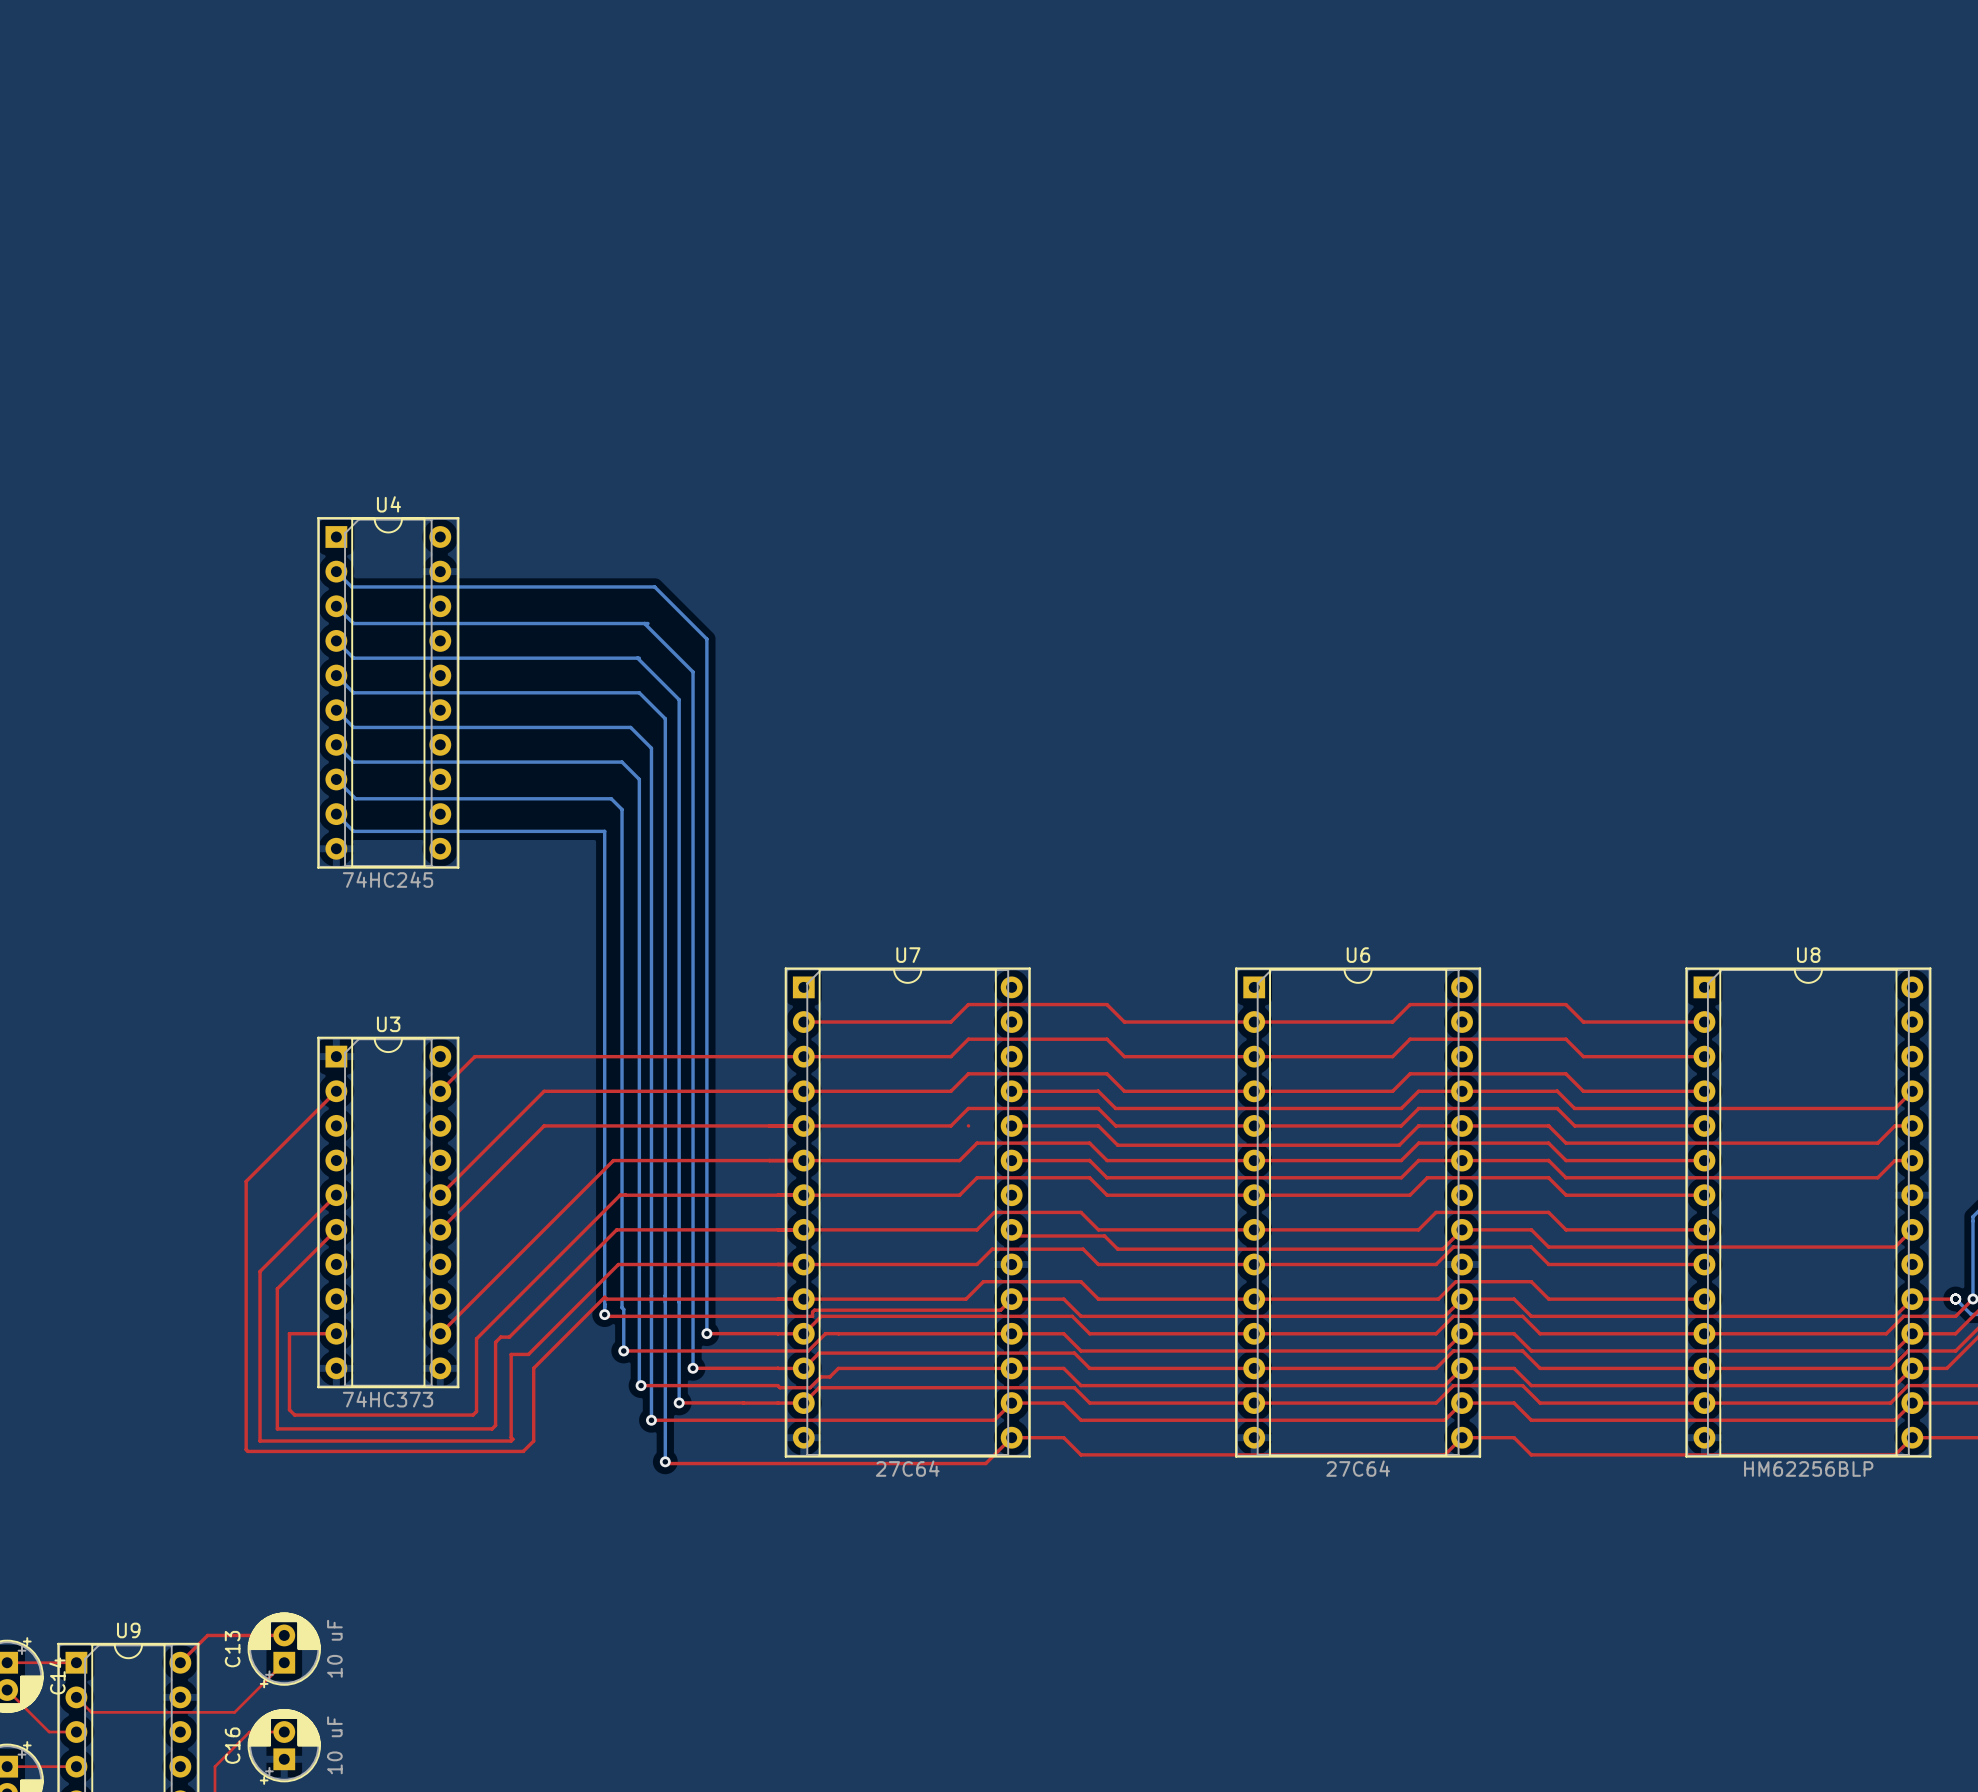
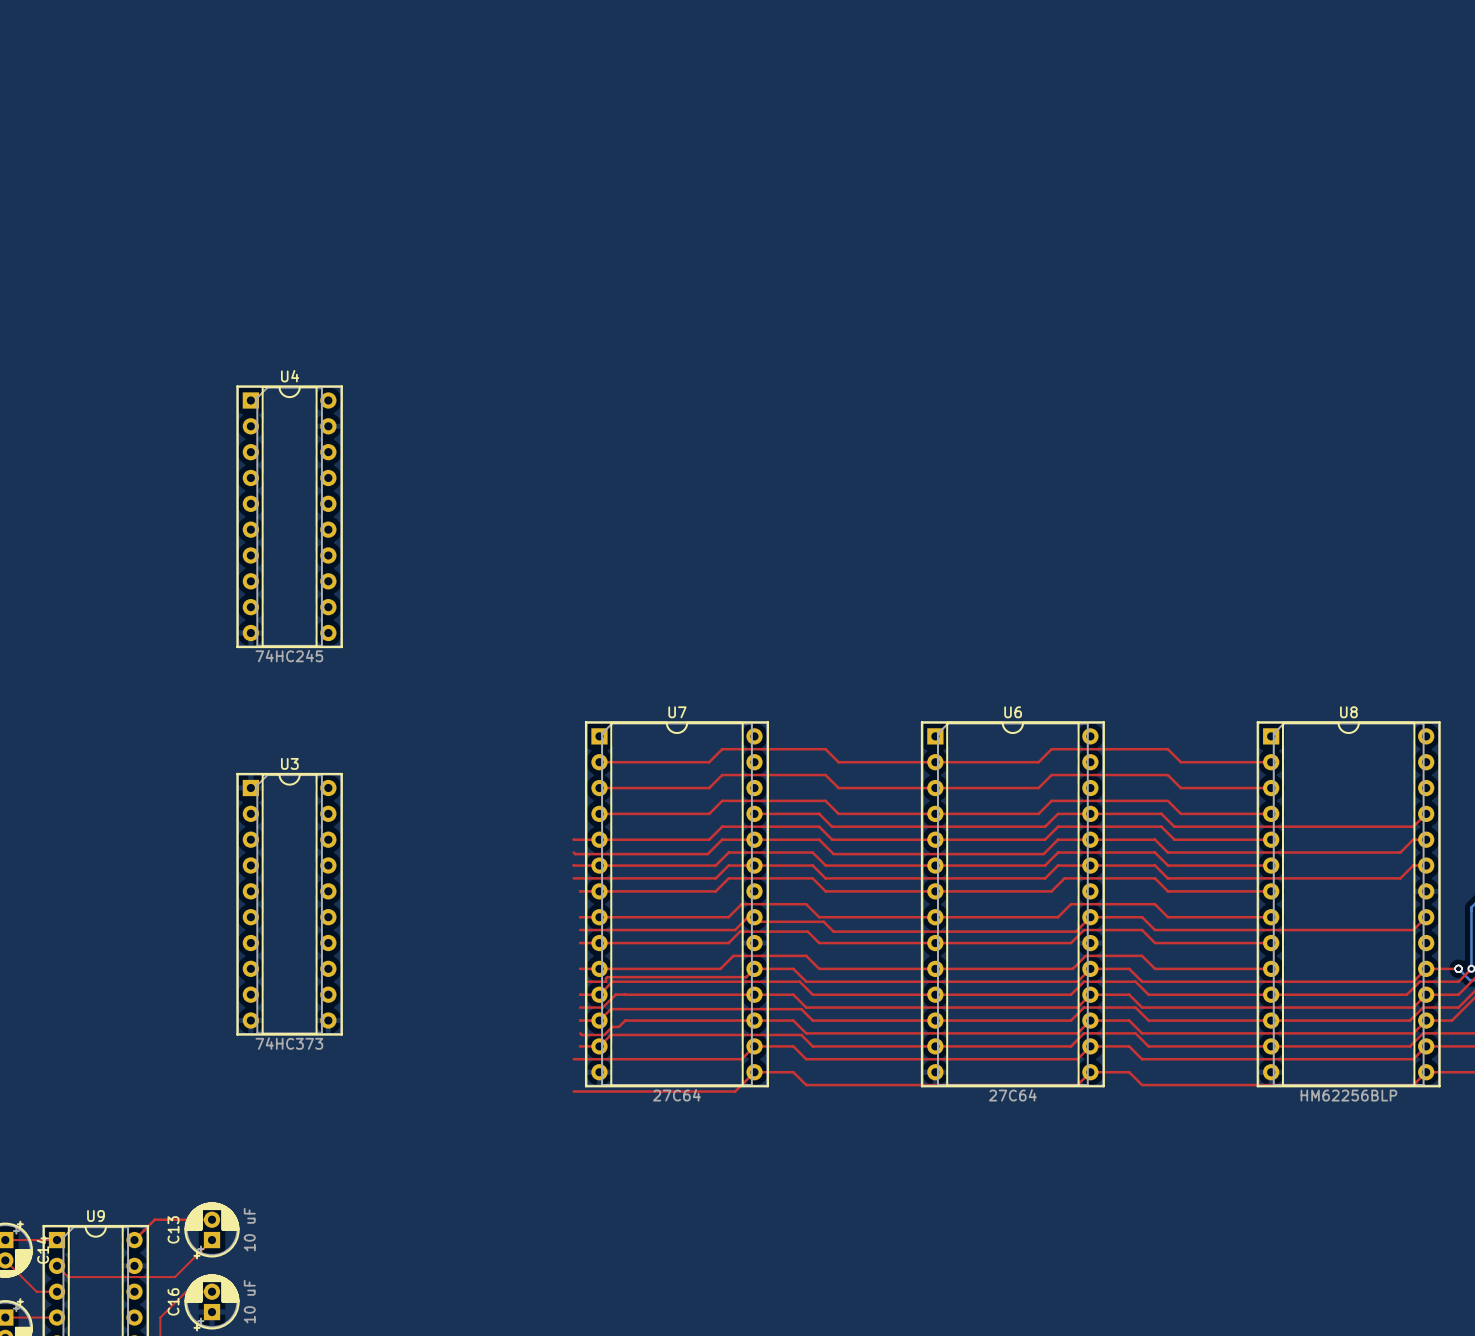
bottom track: (336, 571) (351, 586) (654, 586) (706, 639) (706, 1333) -> none
bottom track: (336, 606) (353, 623) (648, 623) -> none
bottom track: (644, 623) (693, 672) (693, 1368) -> none
bottom track: (336, 640) (353, 658) (639, 658) -> none
bottom track: (637, 658) (679, 699) (679, 1402) -> none
bottom track: (336, 675) (353, 692) (639, 692) (665, 718) (665, 1461) -> none
bottom track: (336, 710) (353, 727) (630, 727) (651, 748) (651, 1420) -> none
bottom track: (336, 744) (353, 762) (622, 762) (639, 779) (639, 1383) (641, 1385) -> none
bottom track: (336, 779) (355, 798) (611, 798) (622, 809) (622, 1307) (623, 1309) (623, 1350) -> none
bottom track: (336, 814) (353, 831) (604, 831) (604, 1314) -> none
top track: (803, 1056) (474, 1056) (440, 1091) -> none
top track: (336, 1091) (246, 1181) (246, 1449) (247, 1451) (523, 1451) (533, 1441) (533, 1368) (604, 1297) (606, 1299) (778, 1299) -> none
top track: (803, 1091) (544, 1091) (440, 1195) -> none
top track: (769, 1125) (544, 1125) (440, 1229) -> none
top track: none -> (722, 839) (707, 854) (575, 854) (573, 852)
top track: none -> (722, 839) (754, 839)
top track: (769, 1160) (613, 1160) (440, 1333) -> none
top track: none -> (754, 865) (728, 865) (715, 878) (573, 878)
top track: (336, 1195) (260, 1271) (260, 1441) (511, 1441) (512, 1439) (511, 1437) (511, 1354) (528, 1354) (618, 1264) (778, 1264) -> none
top track: (625, 1195) (620, 1195) (476, 1338) (476, 1411) (473, 1415) (294, 1415) (289, 1409) (289, 1333) -> none
top track: (625, 1195) (778, 1195) -> none
top track: (336, 1229) (277, 1288) (277, 1428) (492, 1428) (495, 1425) (495, 1342) (500, 1337) (509, 1337) (616, 1229) (778, 1229) -> none
top track: none -> (747, 917) (735, 930) (580, 930)
top track: (604, 1314) (606, 1316) (786, 1316) -> none
via: (604, 1314) -> none
top track: (289, 1333) (336, 1333) -> none
top track: (706, 1333) (777, 1333) -> none
via: (706, 1333) -> none
top track: (623, 1350) (777, 1350) -> none
via: (623, 1350) -> none
top track: (693, 1368) (777, 1368) -> none
via: (693, 1368) -> none
top track: (641, 1385) (777, 1385) -> none
via: (641, 1385) -> none
top track: (679, 1402) (743, 1402) -> none
via: (679, 1402) -> none
top track: (743, 1403) (778, 1403) -> none
top track: (651, 1420) (769, 1420) -> none
via: (651, 1420) -> none
top track: (665, 1461) (667, 1463) (769, 1463) -> none
via: (665, 1461) -> none

